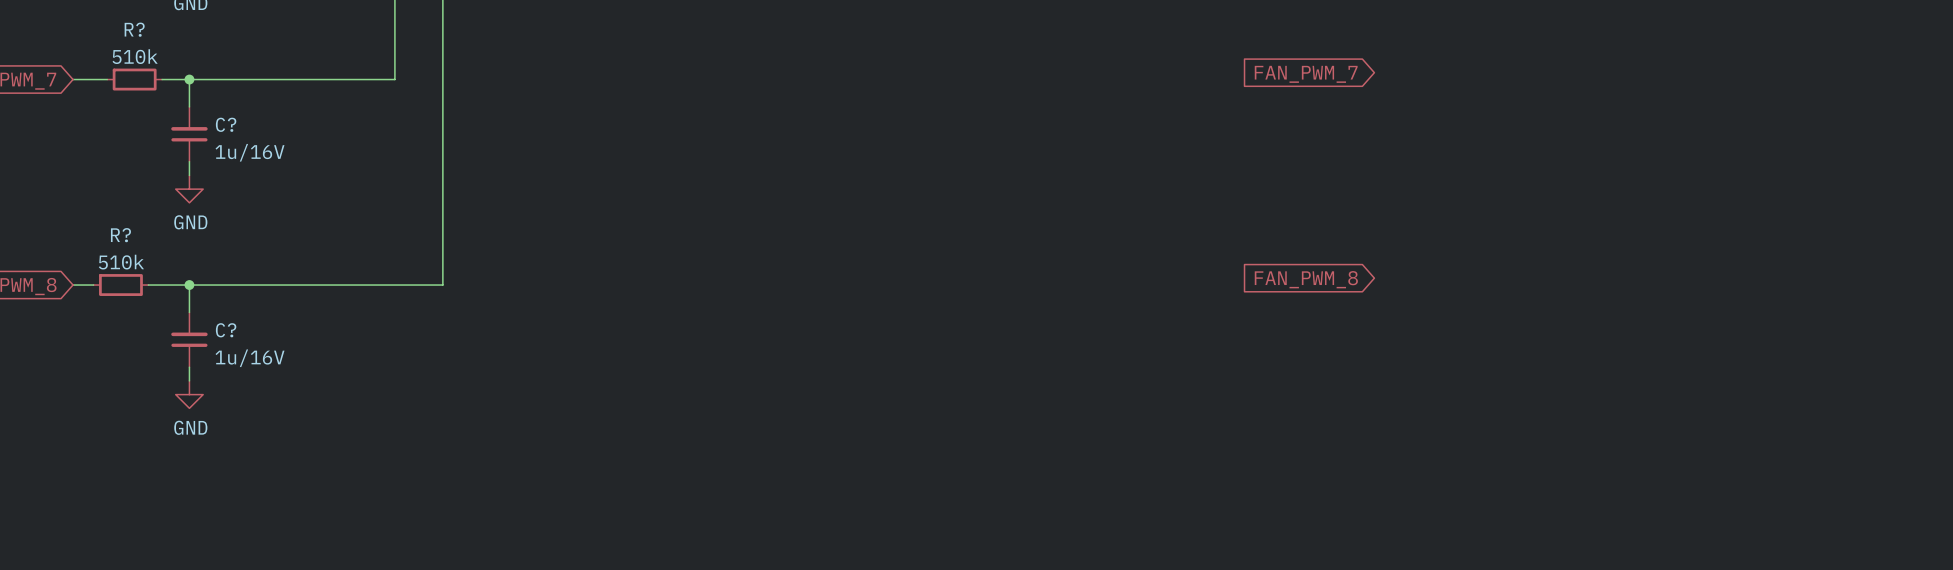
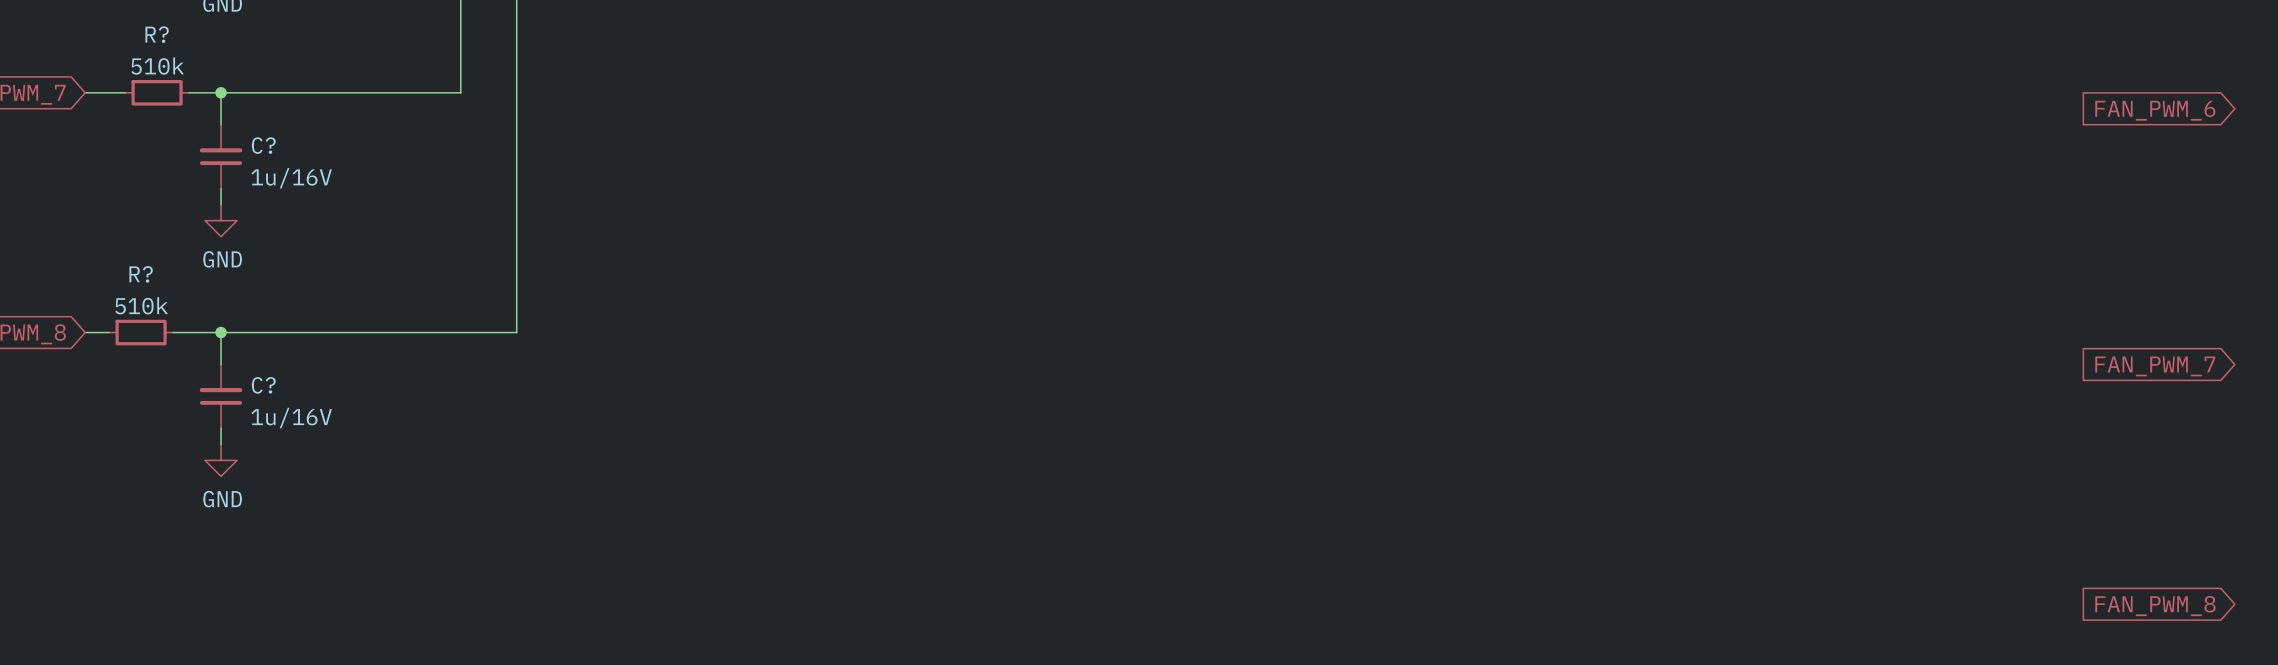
global label: FAN_PWM_7 (1306, 74) -> none
global label: none -> FAN_PWM_6 (2155, 110)
global label: FAN_PWM_8 (1306, 279) -> none
global label: none -> FAN_PWM_7 (2155, 366)
global label: none -> FAN_PWM_8 (2155, 606)

